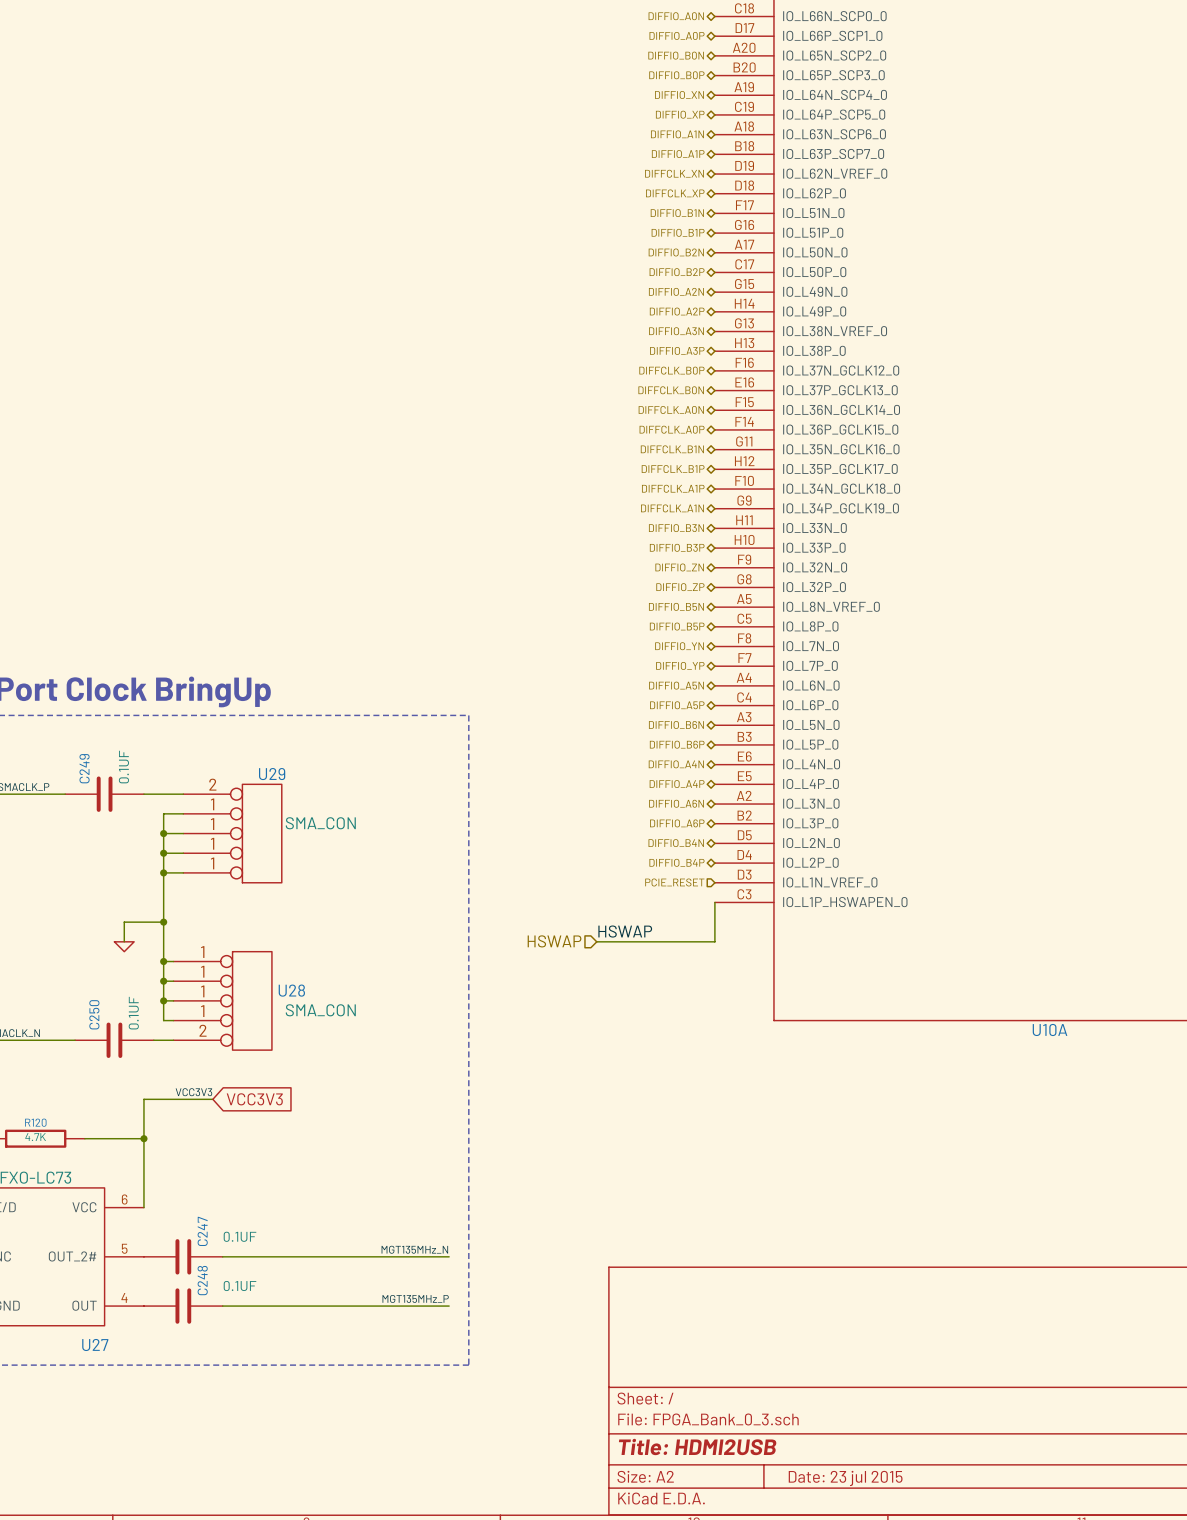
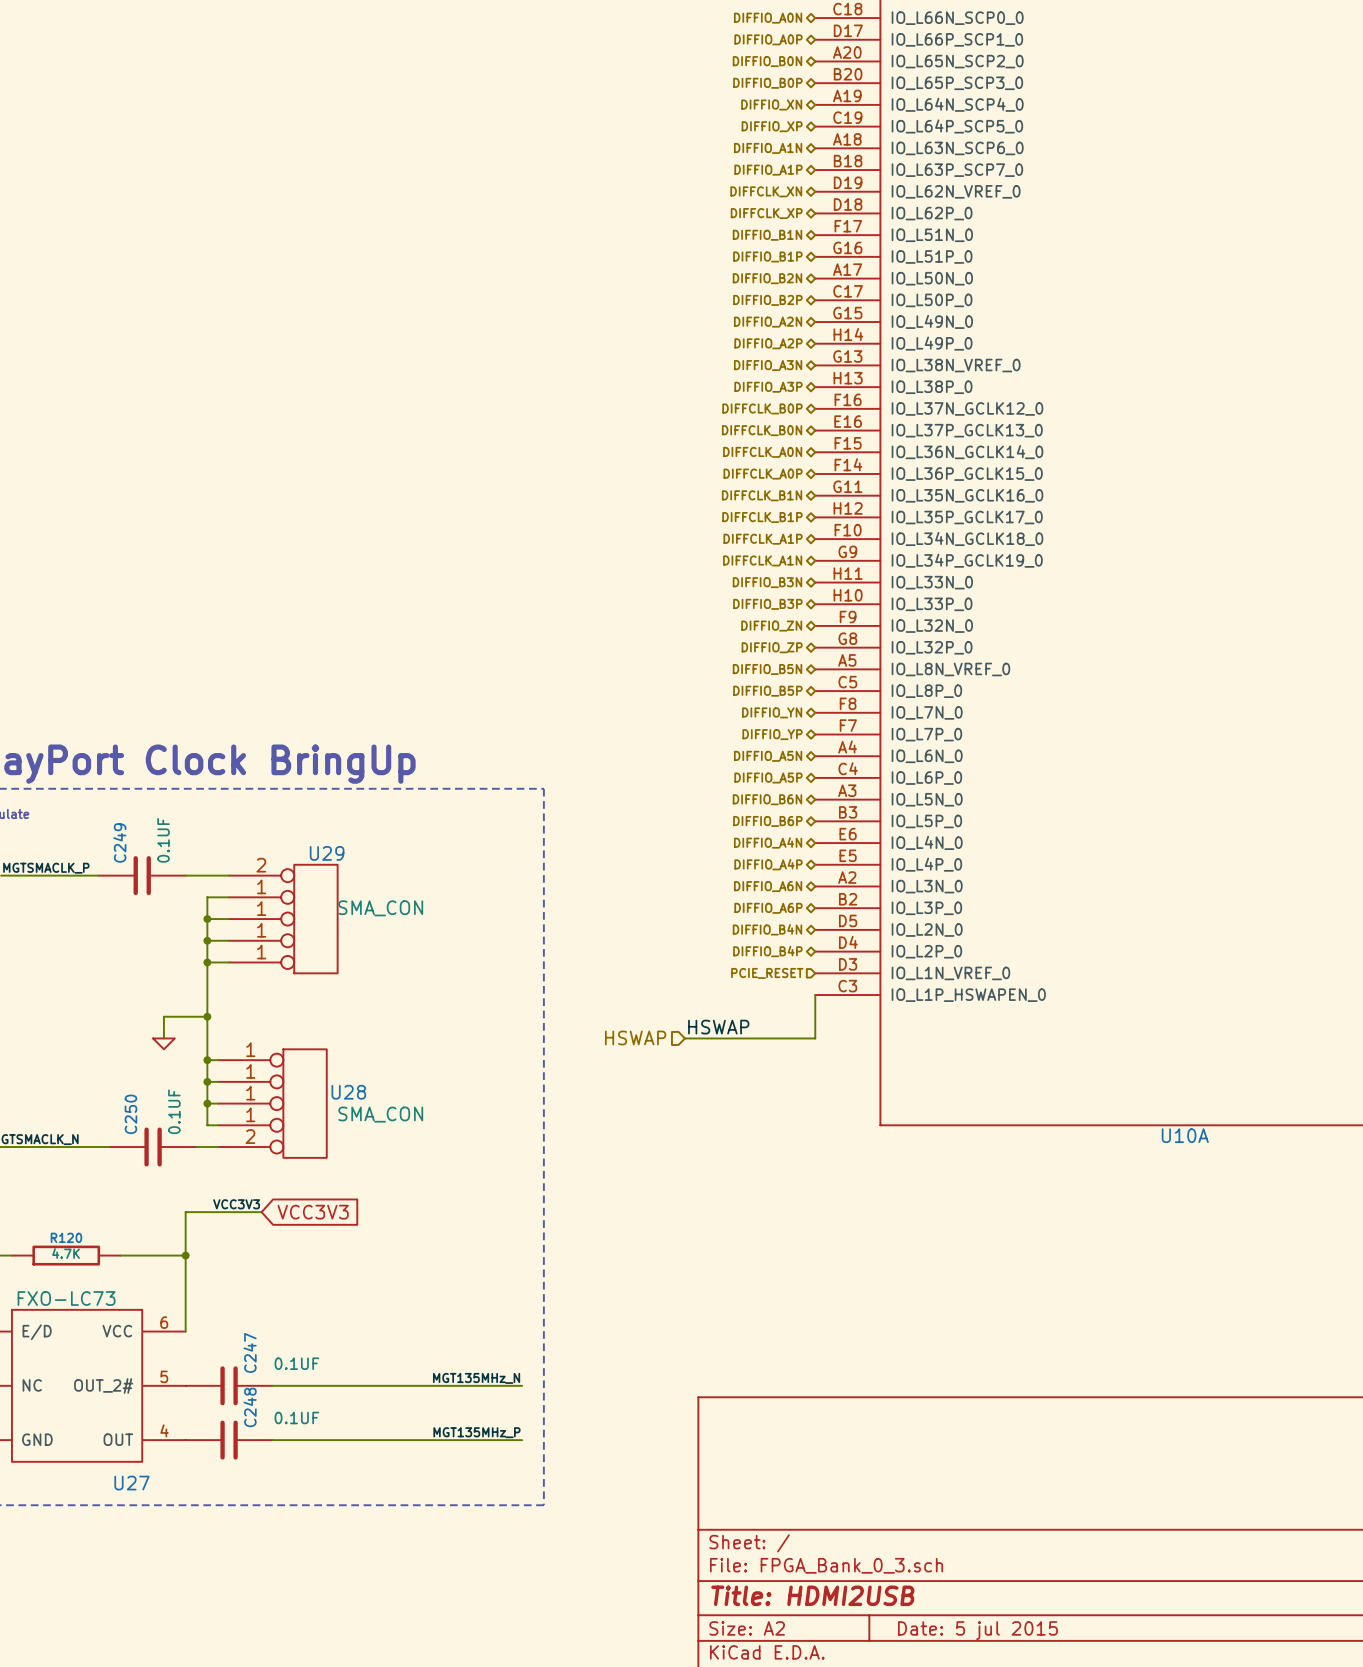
title block: Date: 23 jul 2015 (845, 1478) -> Date: 5 jul 2015 (977, 1630)

